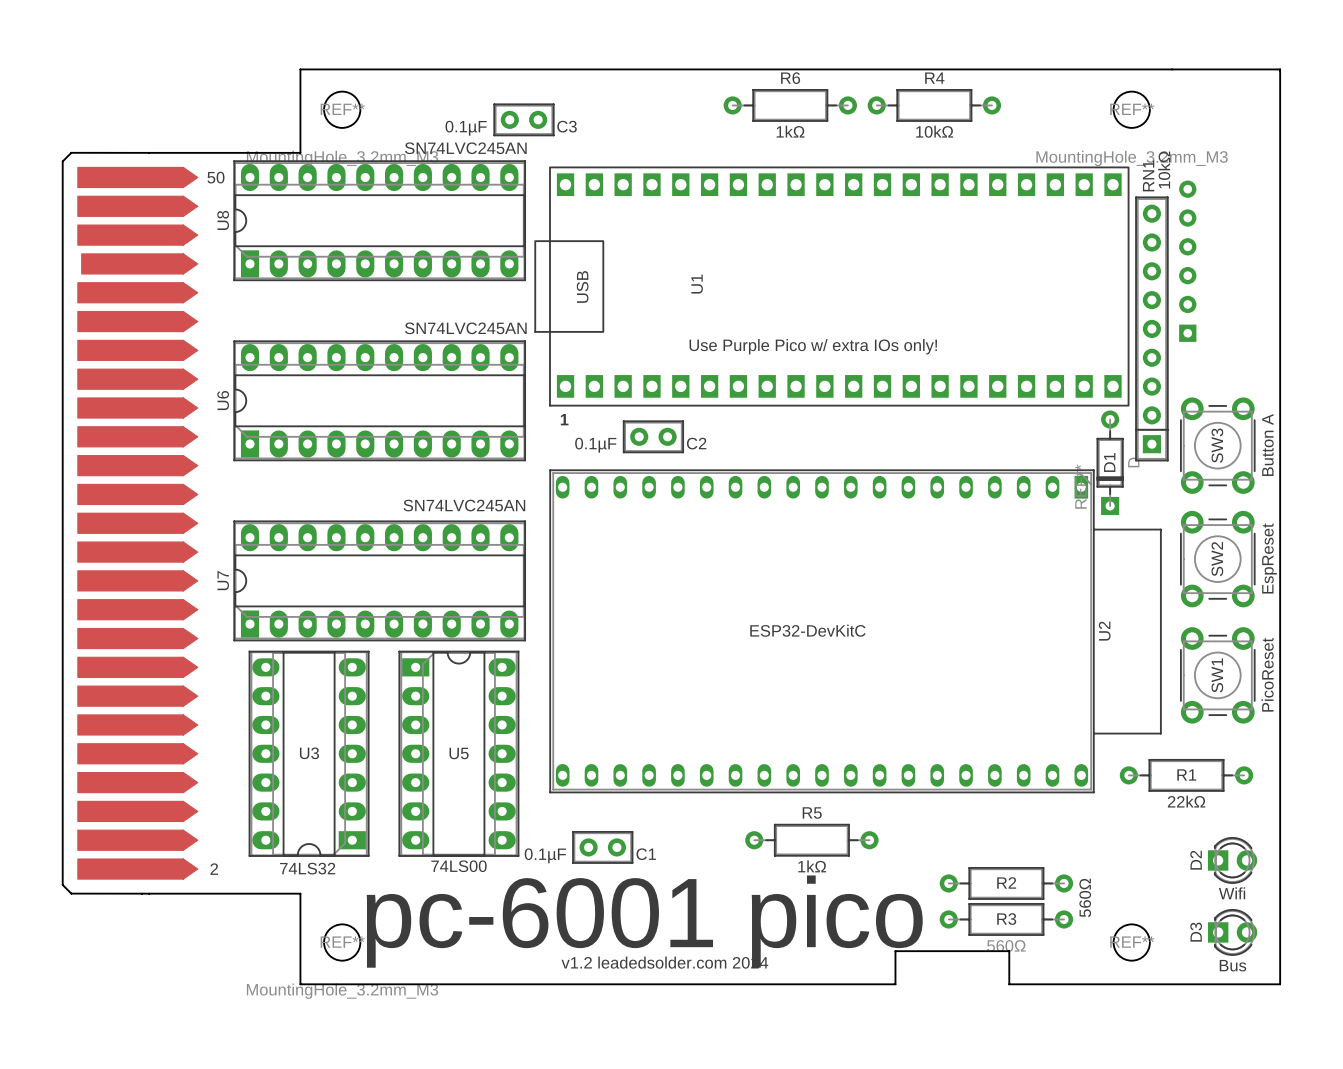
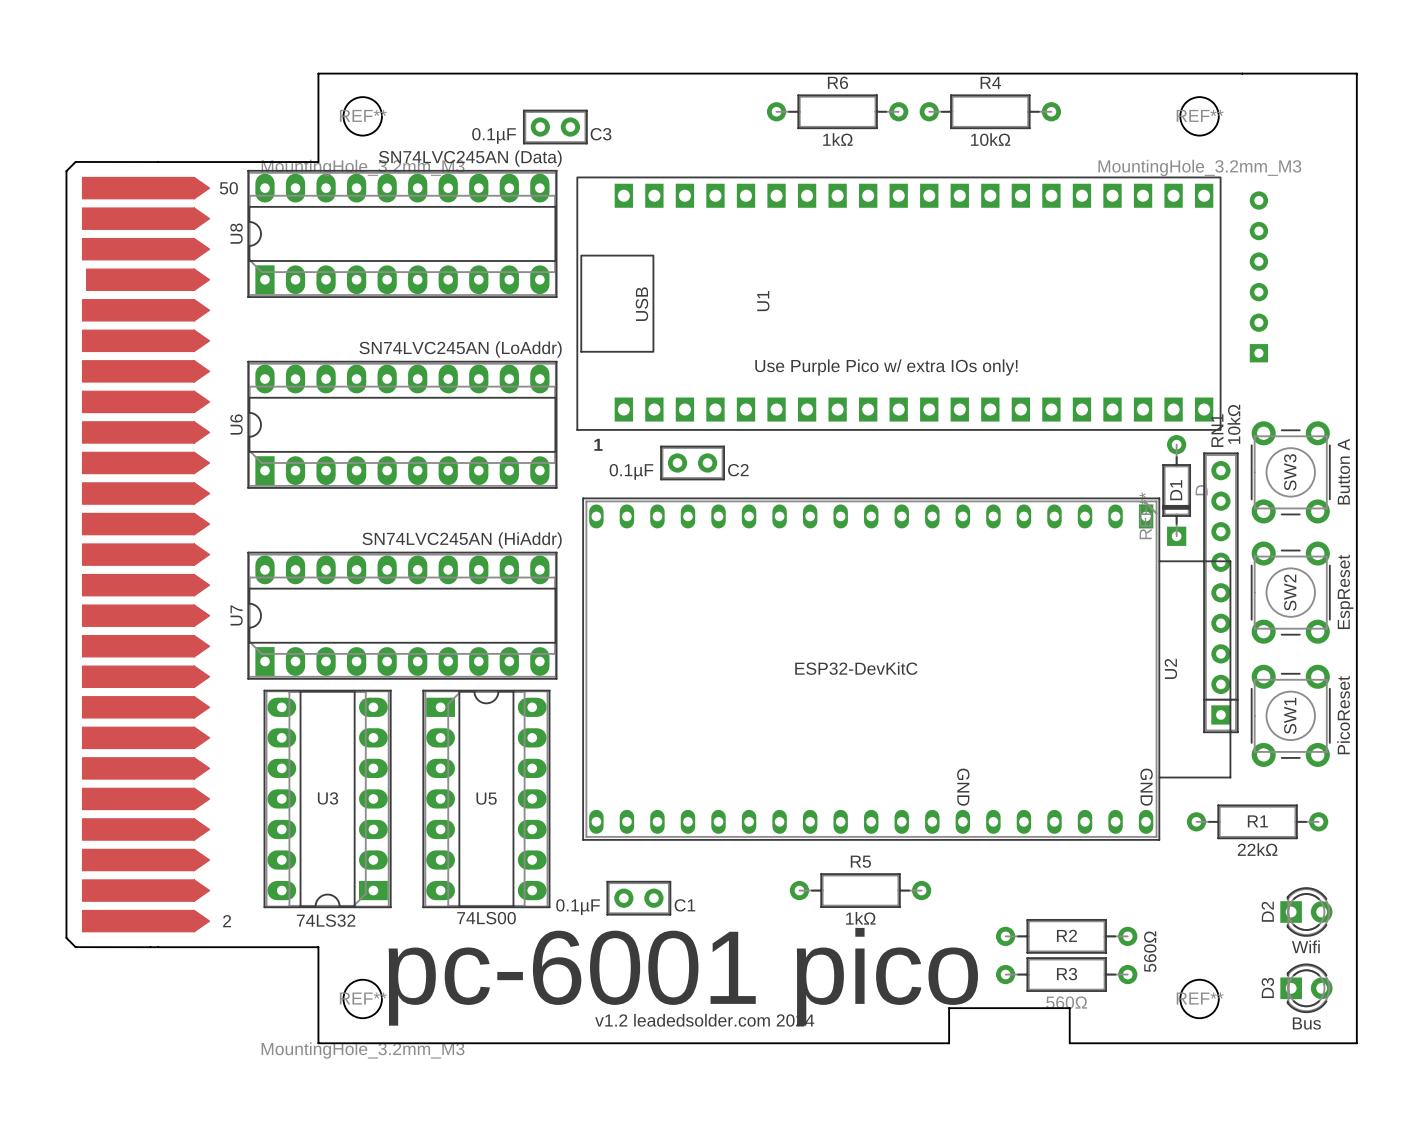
U8 value: SN74LVC245AN (465, 148) -> SN74LVC245AN (Data) (470, 158)
U1 footprint: [534, 166, 1130, 407] -> [576, 176, 1222, 431]
U6 value: SN74LVC245AN (465, 328) -> SN74LVC245AN (LoAddr) (460, 349)
RN1 position: (1151, 328) -> (1220, 592)
U7 value: SN74LVC245AN (464, 505) -> SN74LVC245AN (HiAddr) (462, 540)
U2 text: none -> GND (963, 787)
U2 text: none -> GND (1146, 787)

